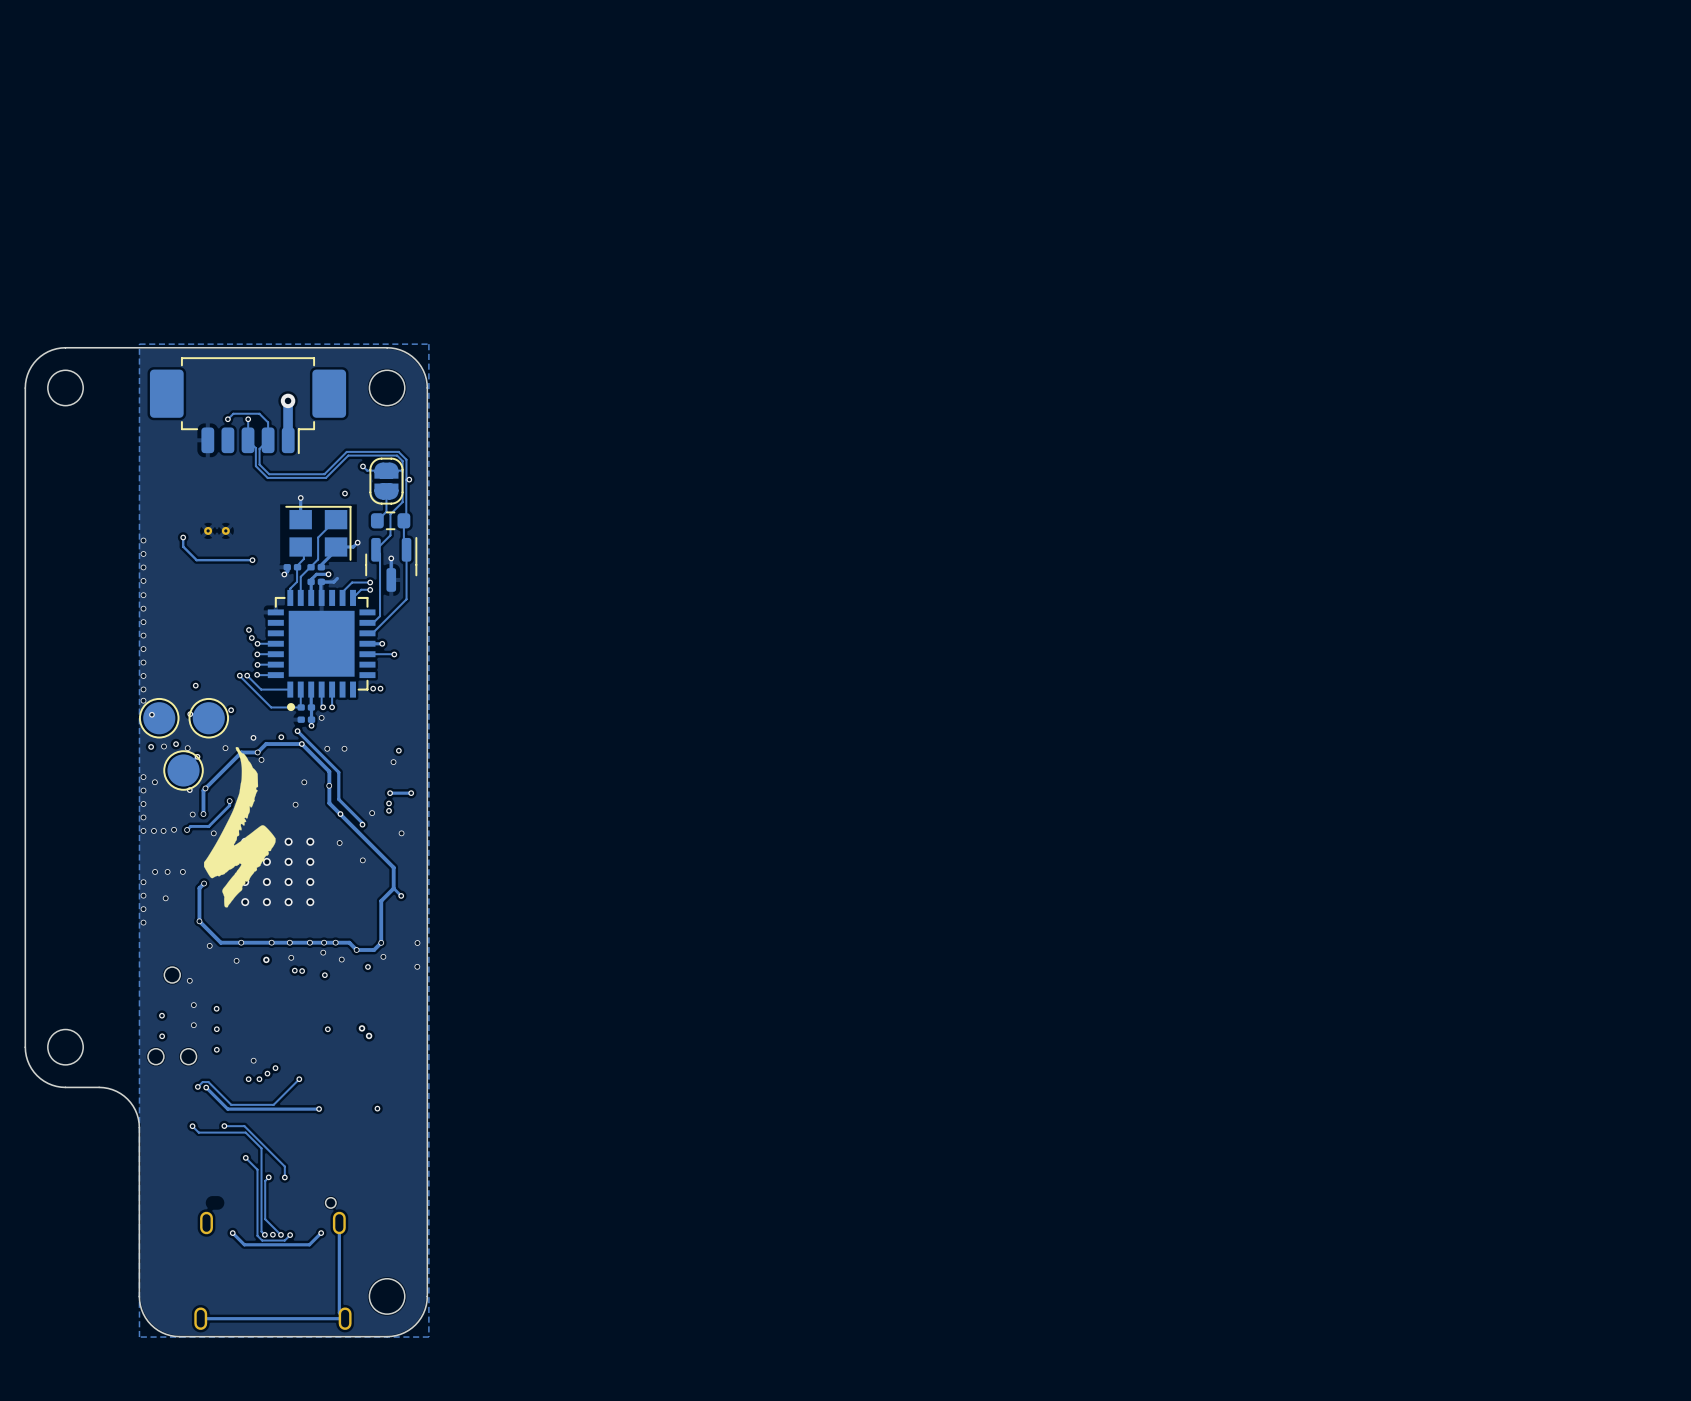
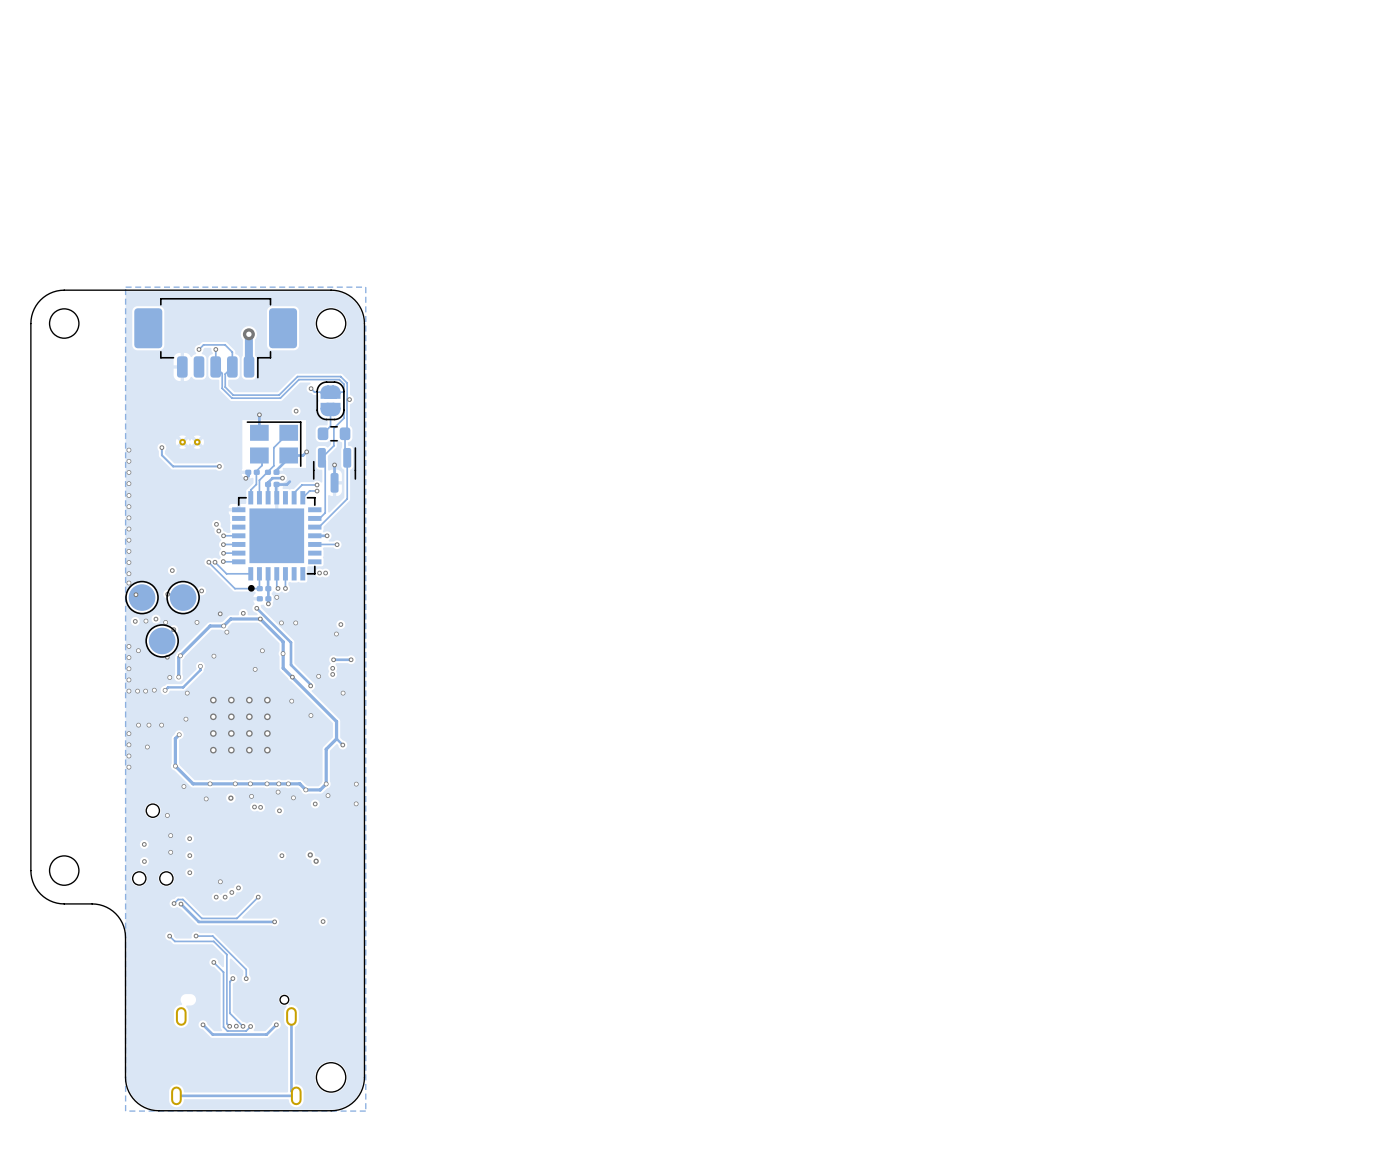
drawing: [204, 747, 276, 908] -> none

